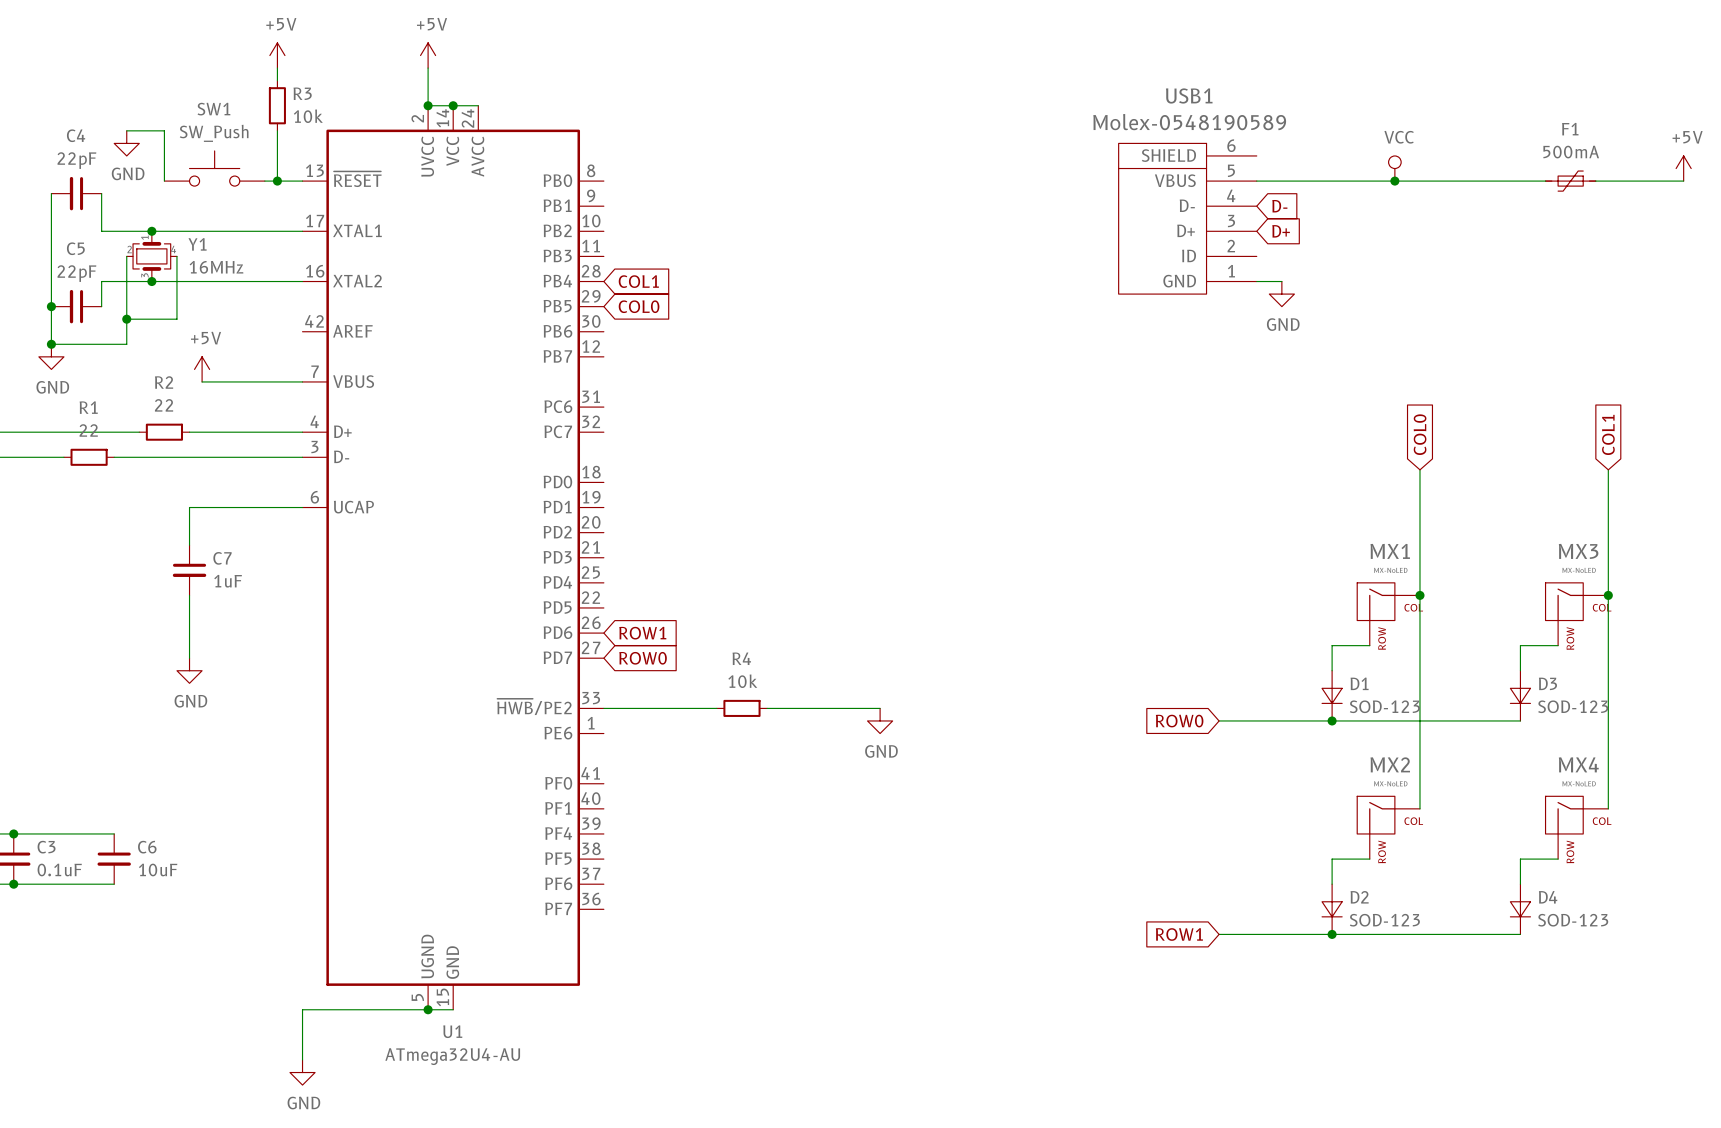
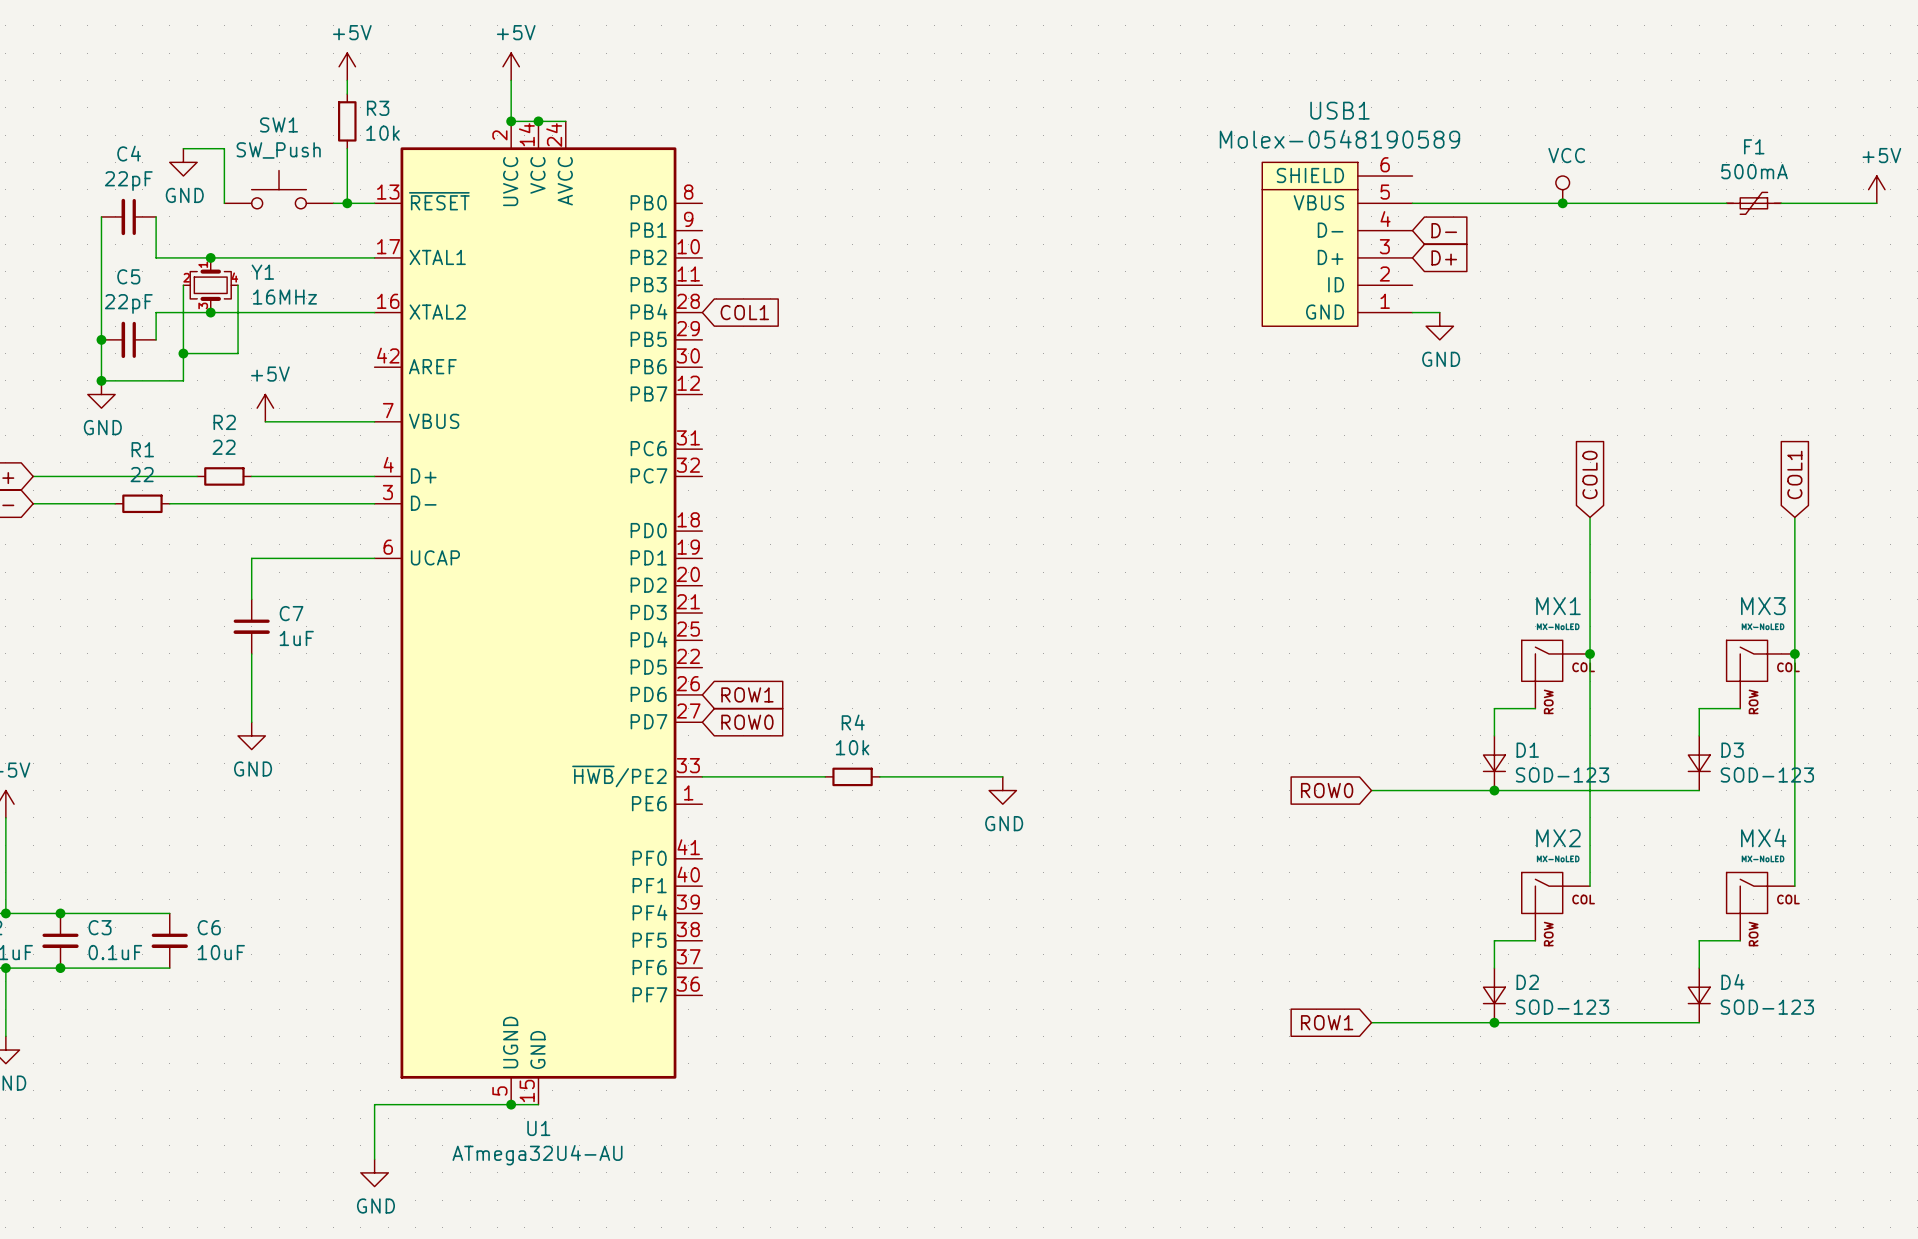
global label: COL0 (639, 306) -> none

